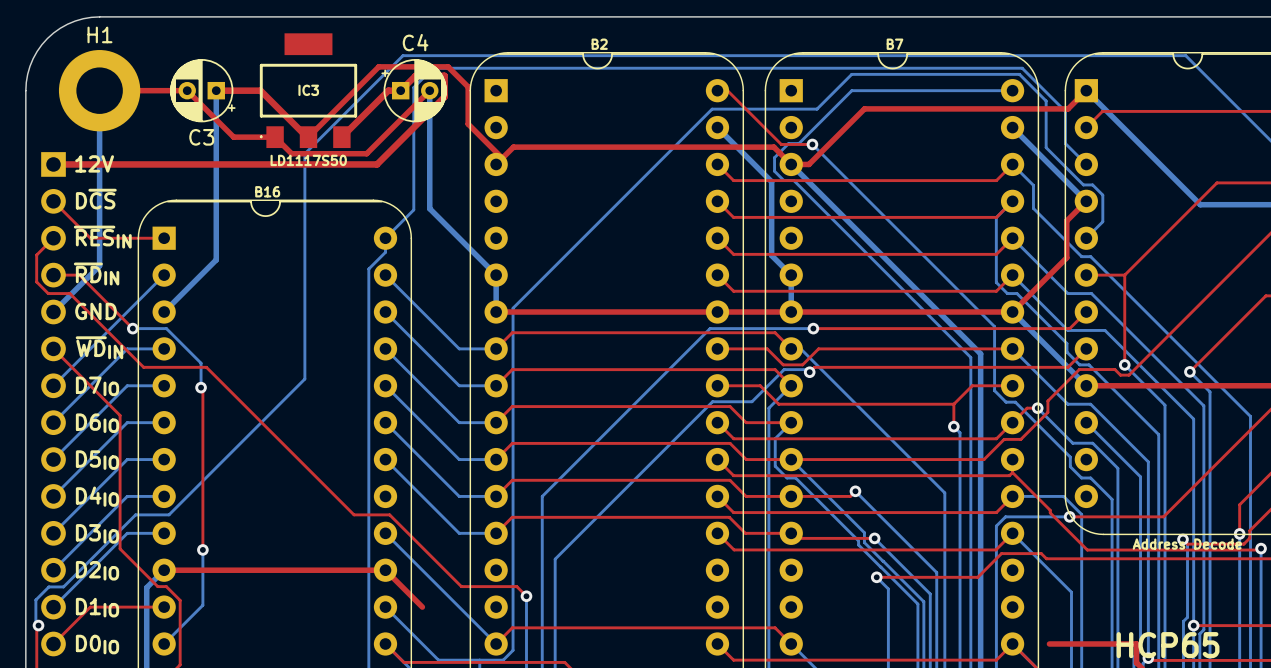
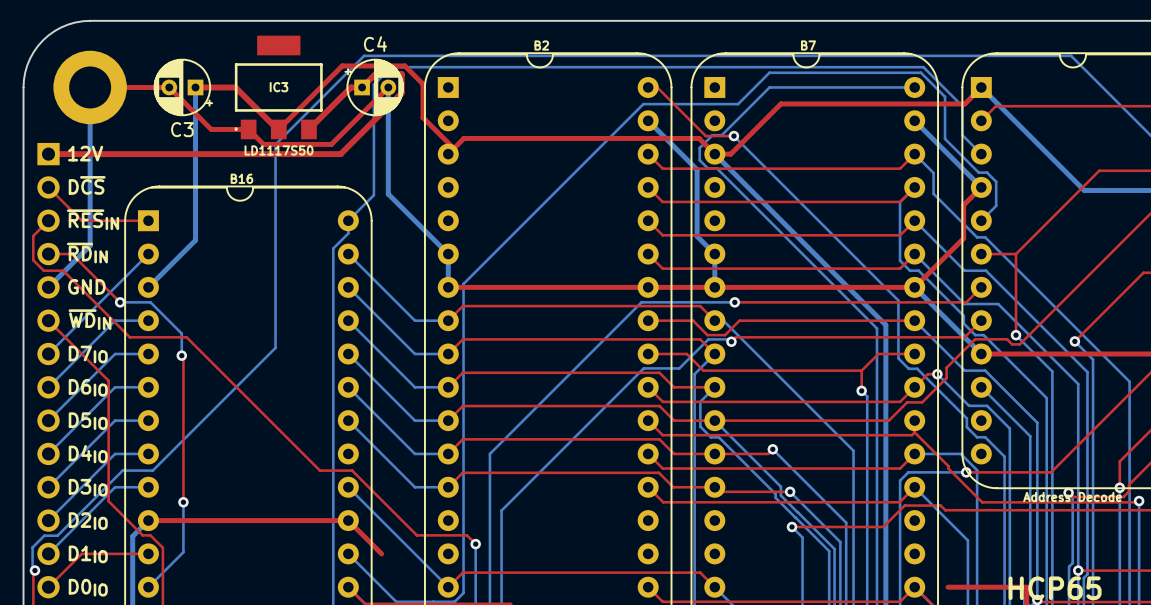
H1 name: H1 (99, 34) -> none

